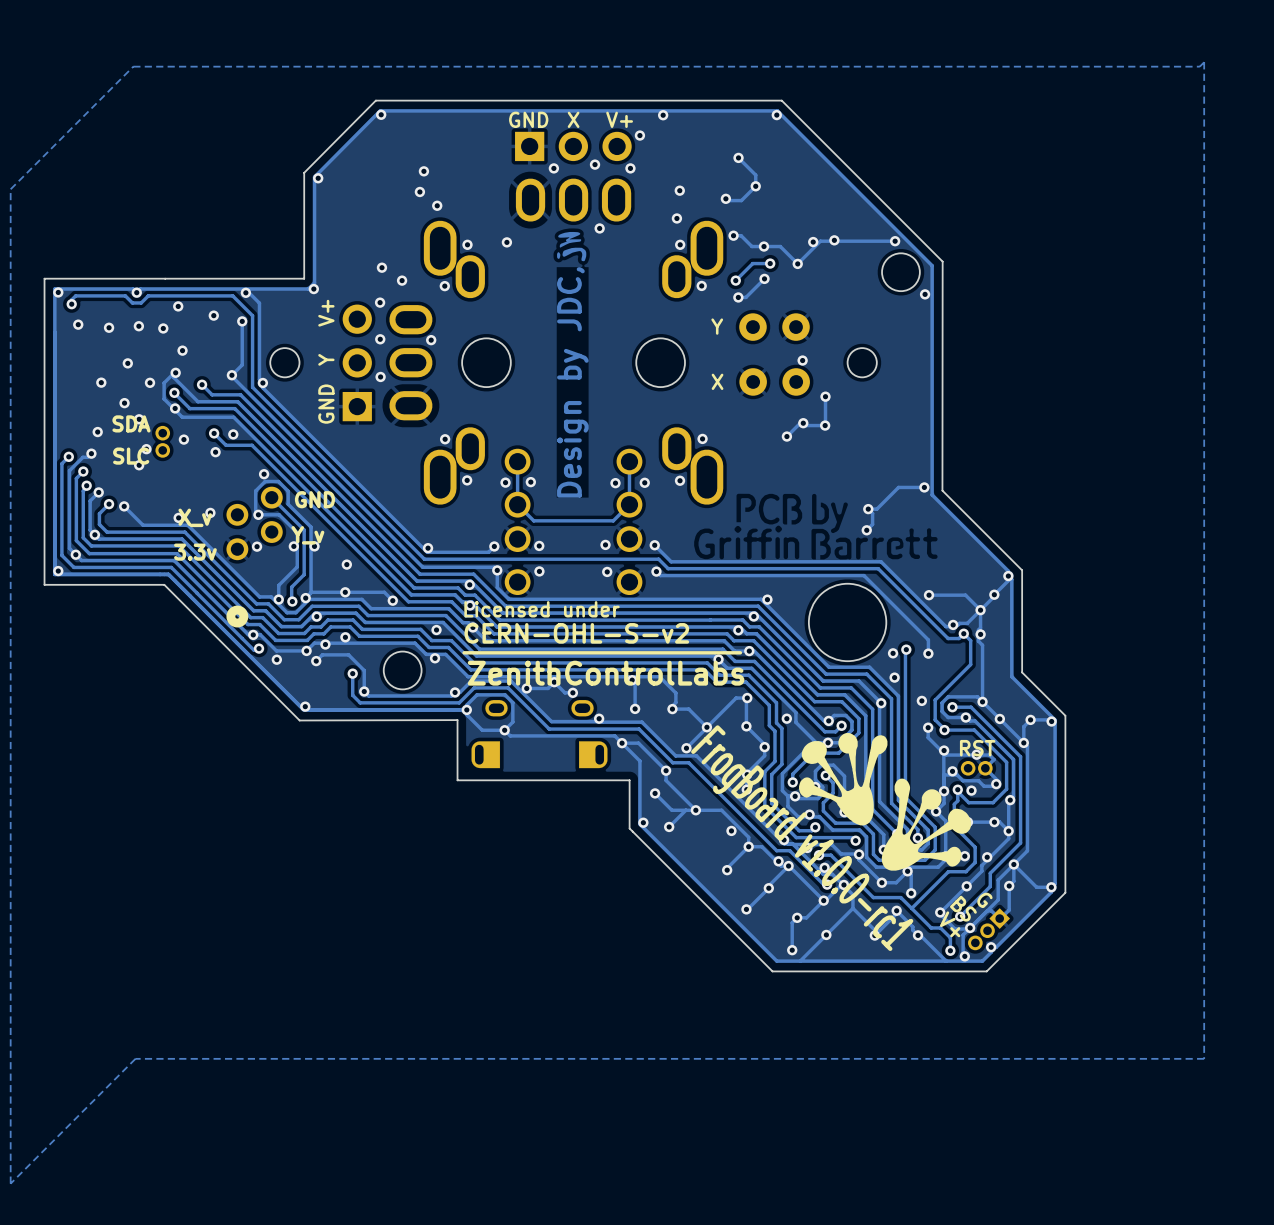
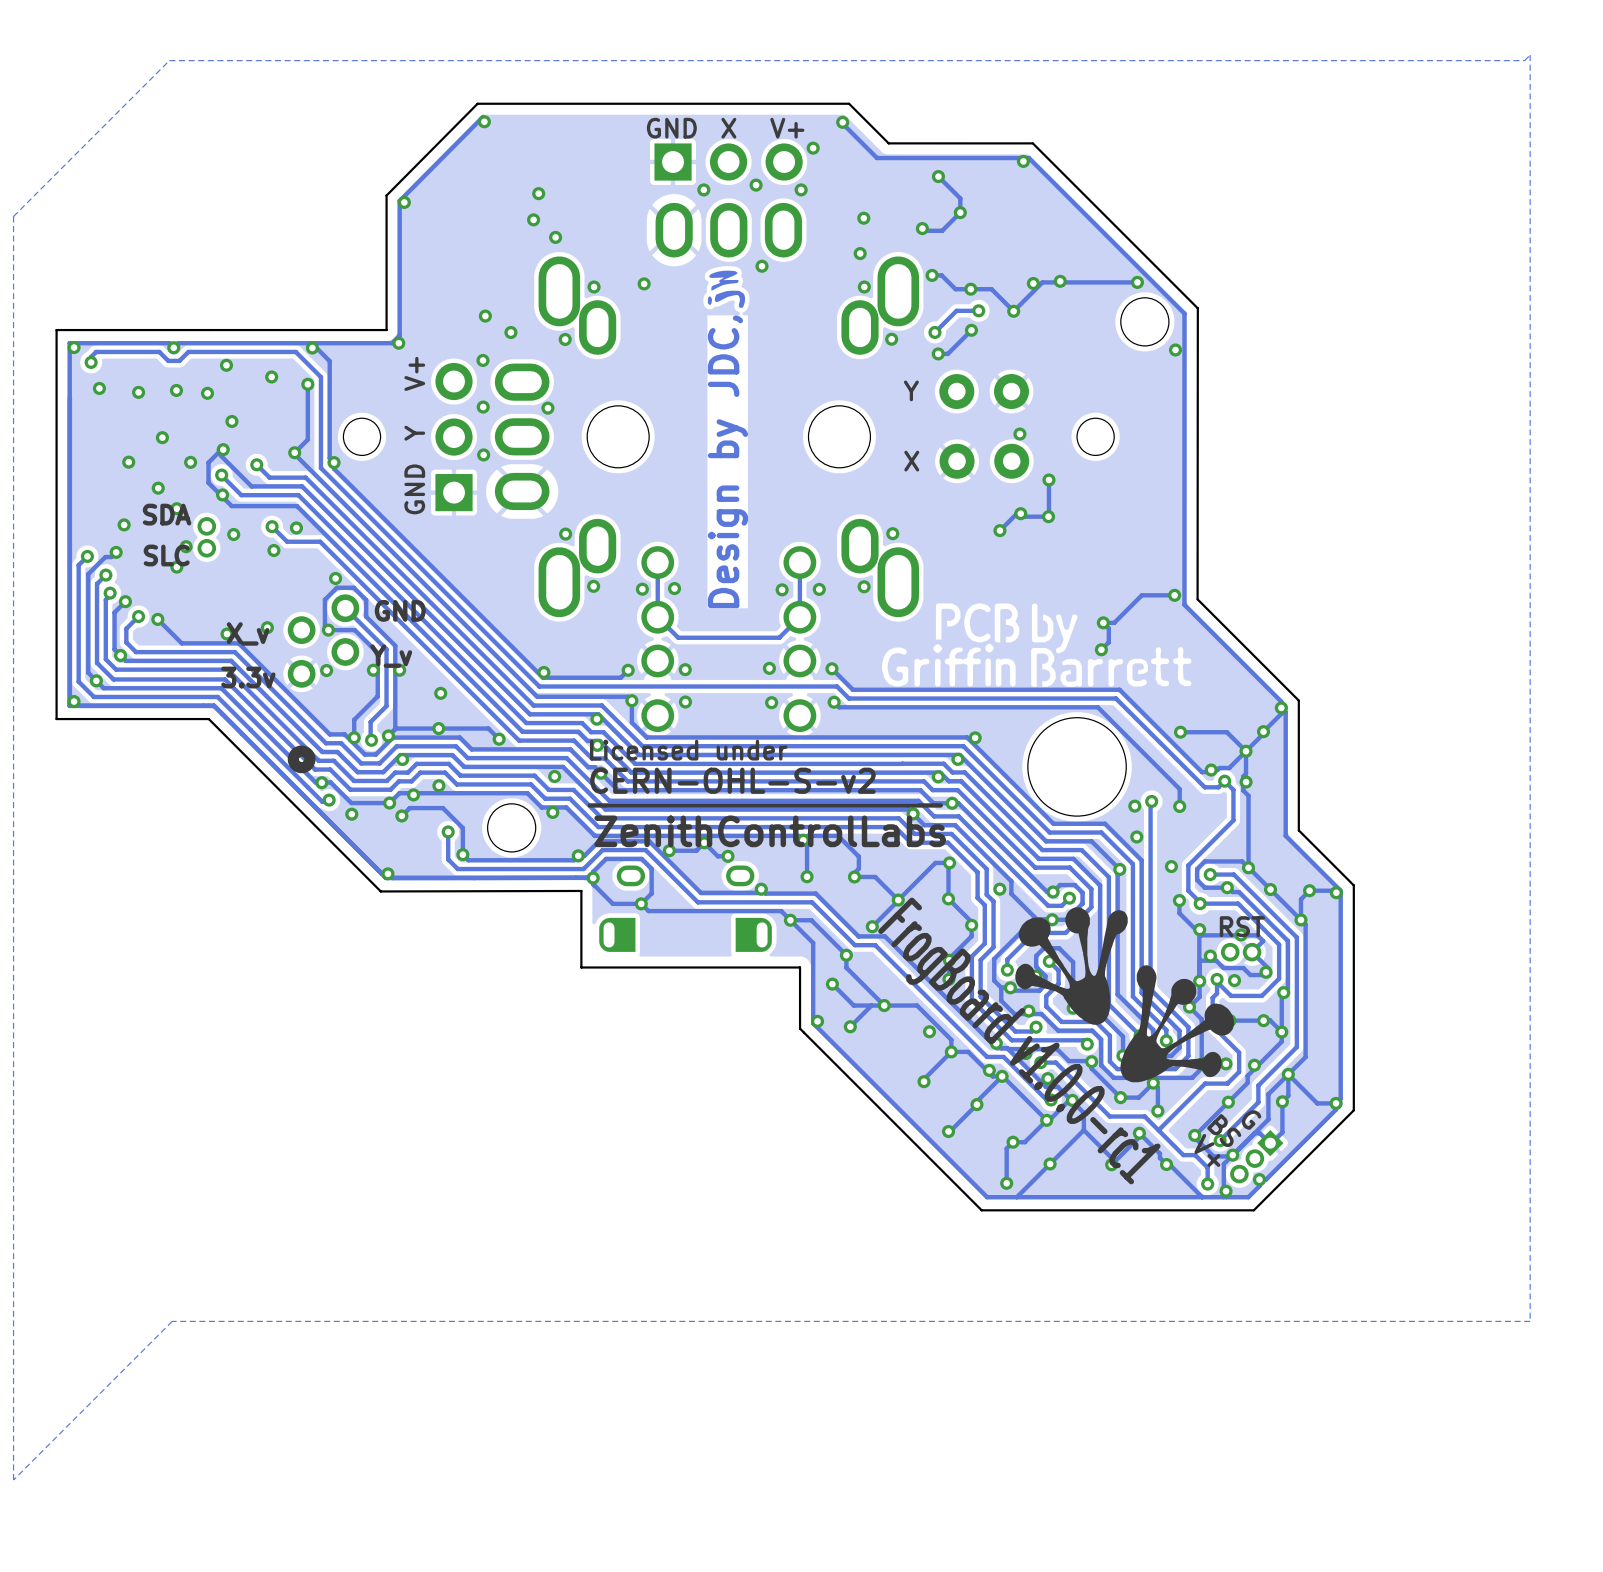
board edge: (668, 100) (781, 100) (942, 261) -> (849, 103) (888, 143) (1032, 143) (1197, 308)
track: (777, 110) (380, 110) -> none
track: (777, 111) (809, 143) -> (840, 121) (877, 158) (1028, 158)
via position: (776, 115) -> (1023, 161)

